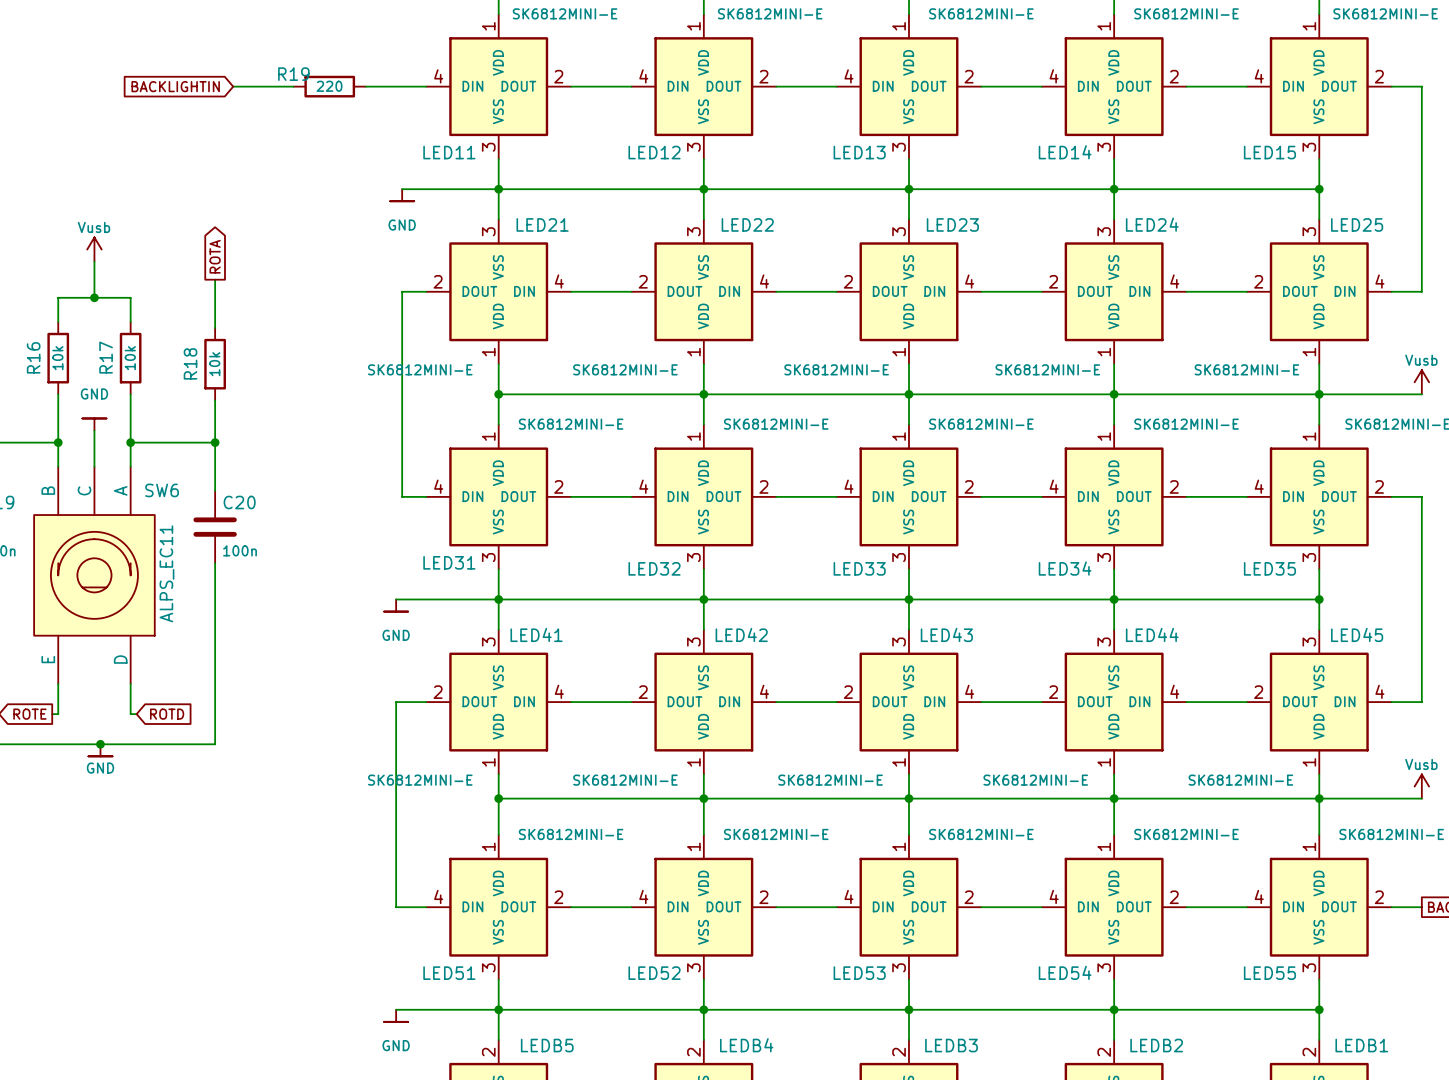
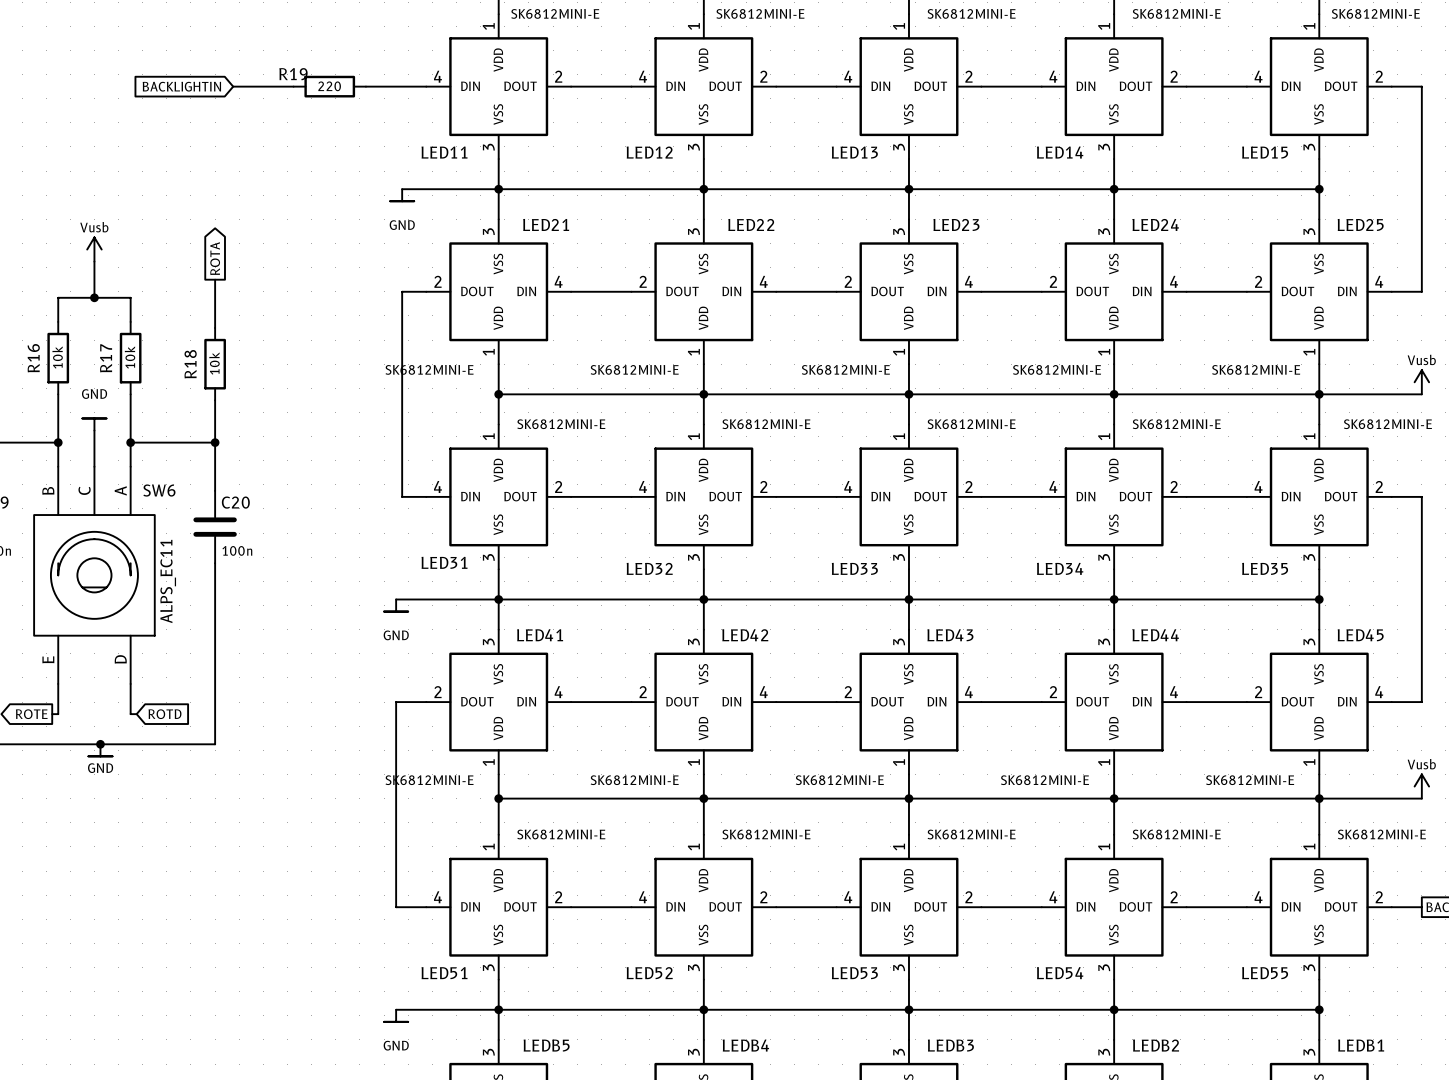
LEDB5 pin number: 2 (488, 1052) -> 3 (488, 1052)
LEDB4 pin number: 2 (693, 1052) -> 3 (693, 1052)
LEDB3 pin number: 2 (899, 1052) -> 3 (899, 1052)
LEDB2 pin number: 2 (1104, 1052) -> 3 (1104, 1052)
LEDB1 pin number: 2 (1309, 1052) -> 3 (1309, 1052)

